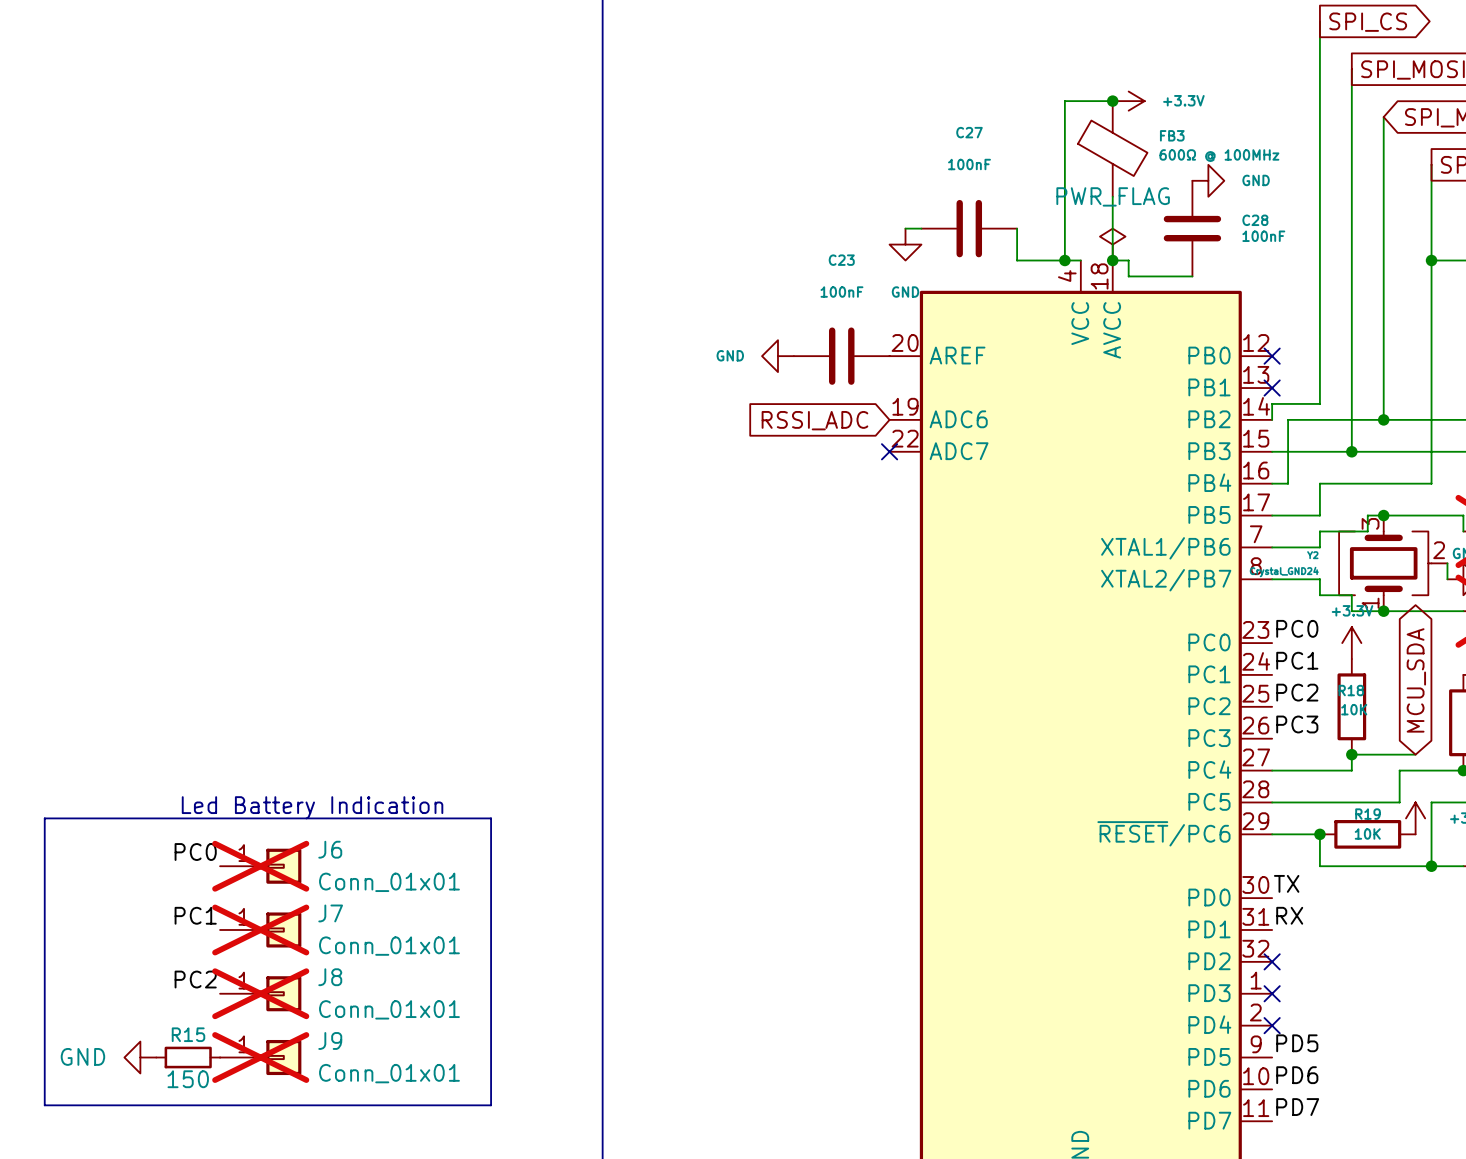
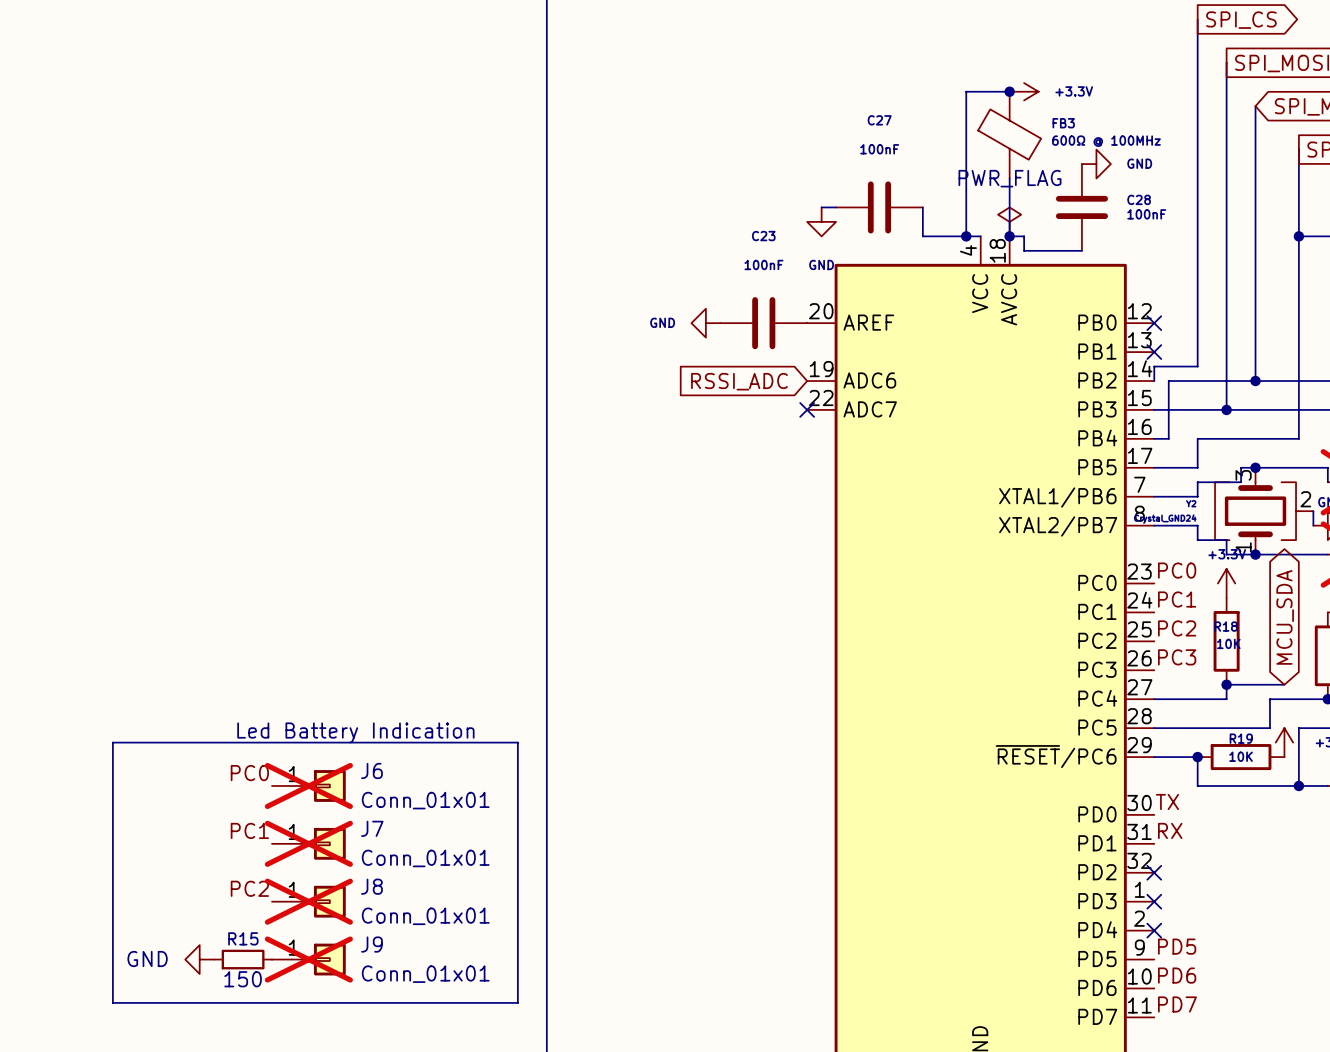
text position: Led Battery Indication (312, 807) -> Led Battery Indication (355, 732)
line: (124, 818) (44, 818) (44, 1105) (124, 1105) -> (112, 742) (112, 1002)
line: (491, 818) (491, 1105) -> (445, 742) (517, 742) (517, 1002) (445, 1002)
label position: PC0 (195, 852) -> PC0 (249, 773)
J6 position: (260, 866) -> (308, 785)
label position: PC1 (195, 915) -> PC1 (249, 830)
J7 position: (260, 929) -> (308, 843)
label position: PC2 (195, 979) -> PC2 (249, 888)
J8 position: (260, 993) -> (308, 901)
power symbol position: GND (140, 1057) -> GND (199, 959)
R15 position: (188, 1057) -> (243, 959)
J9 position: (260, 1057) -> (308, 959)

